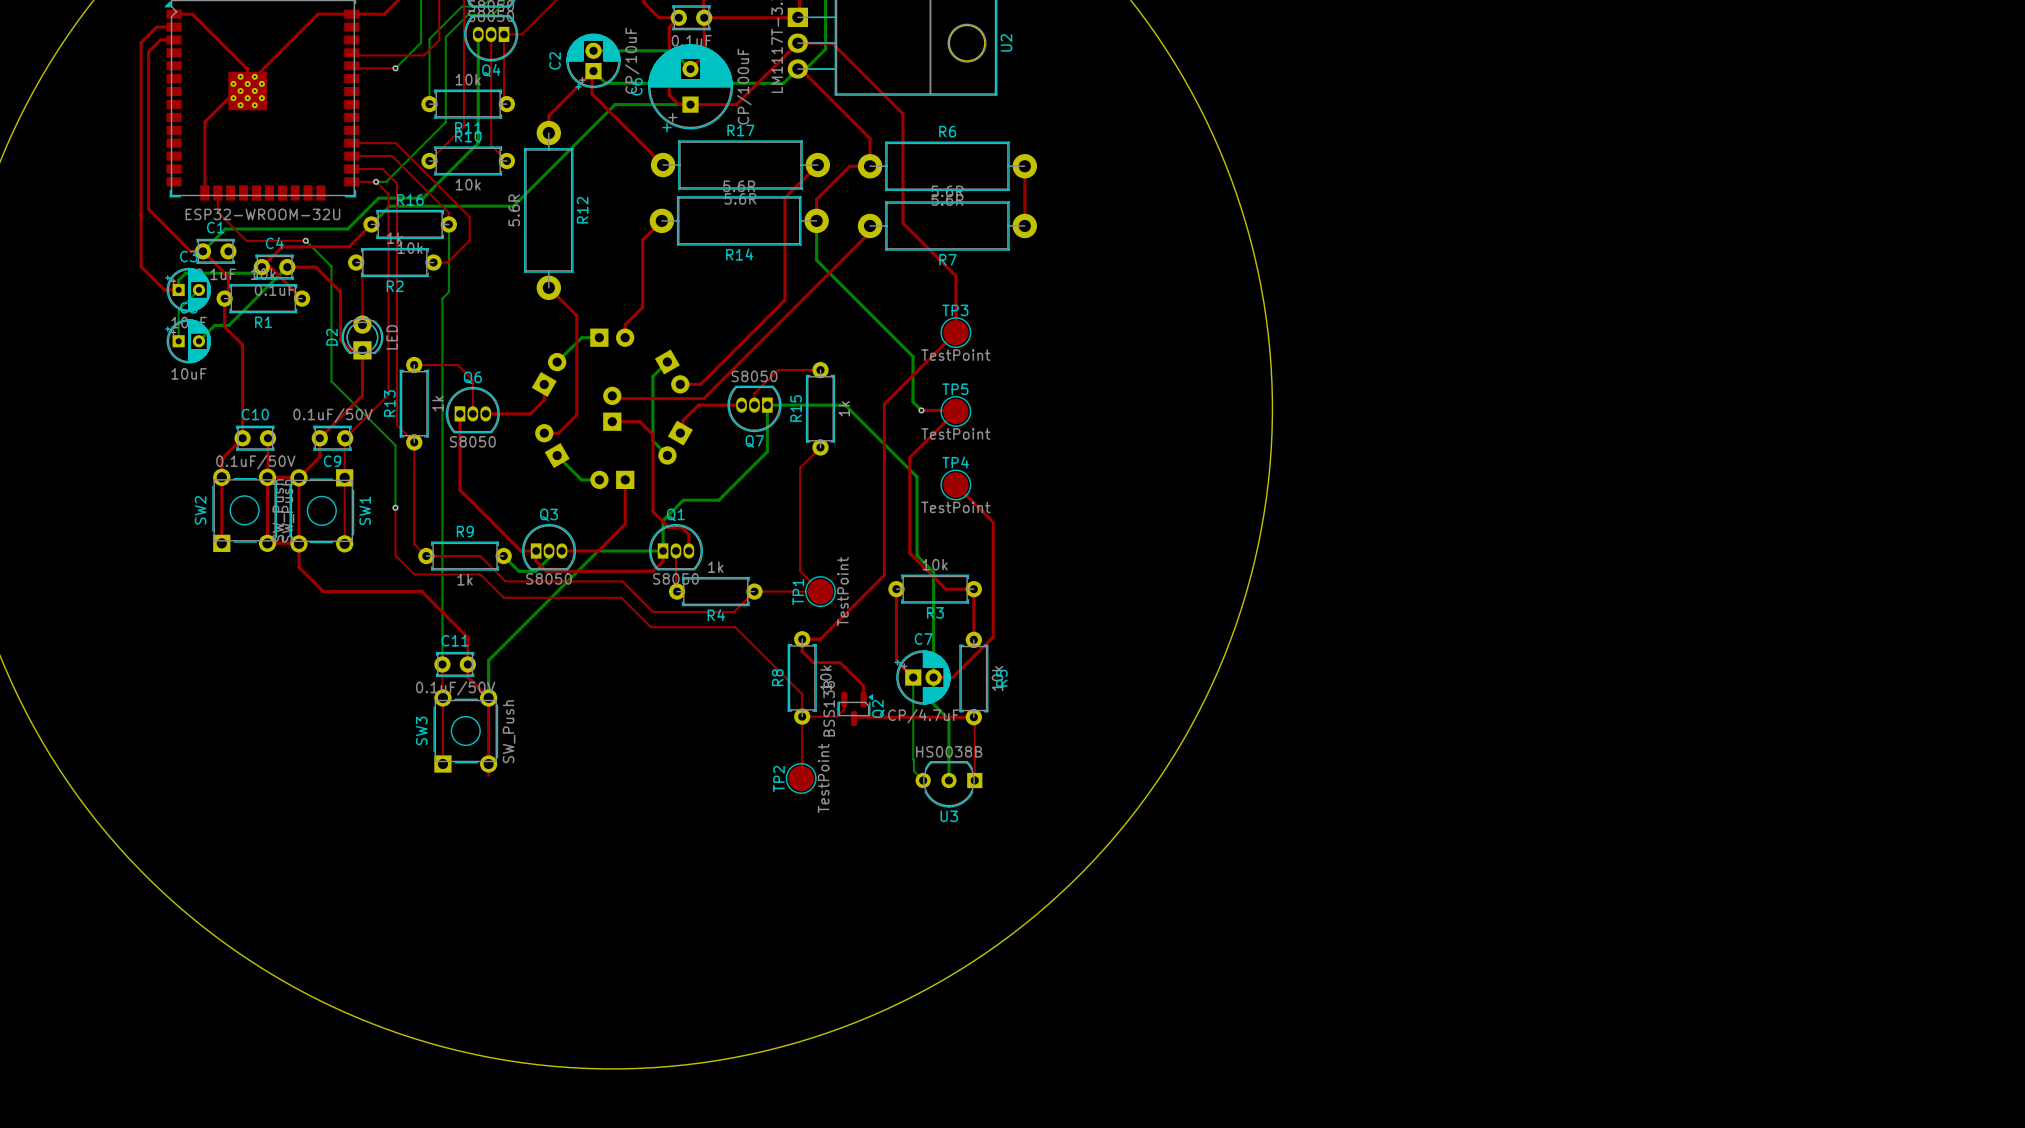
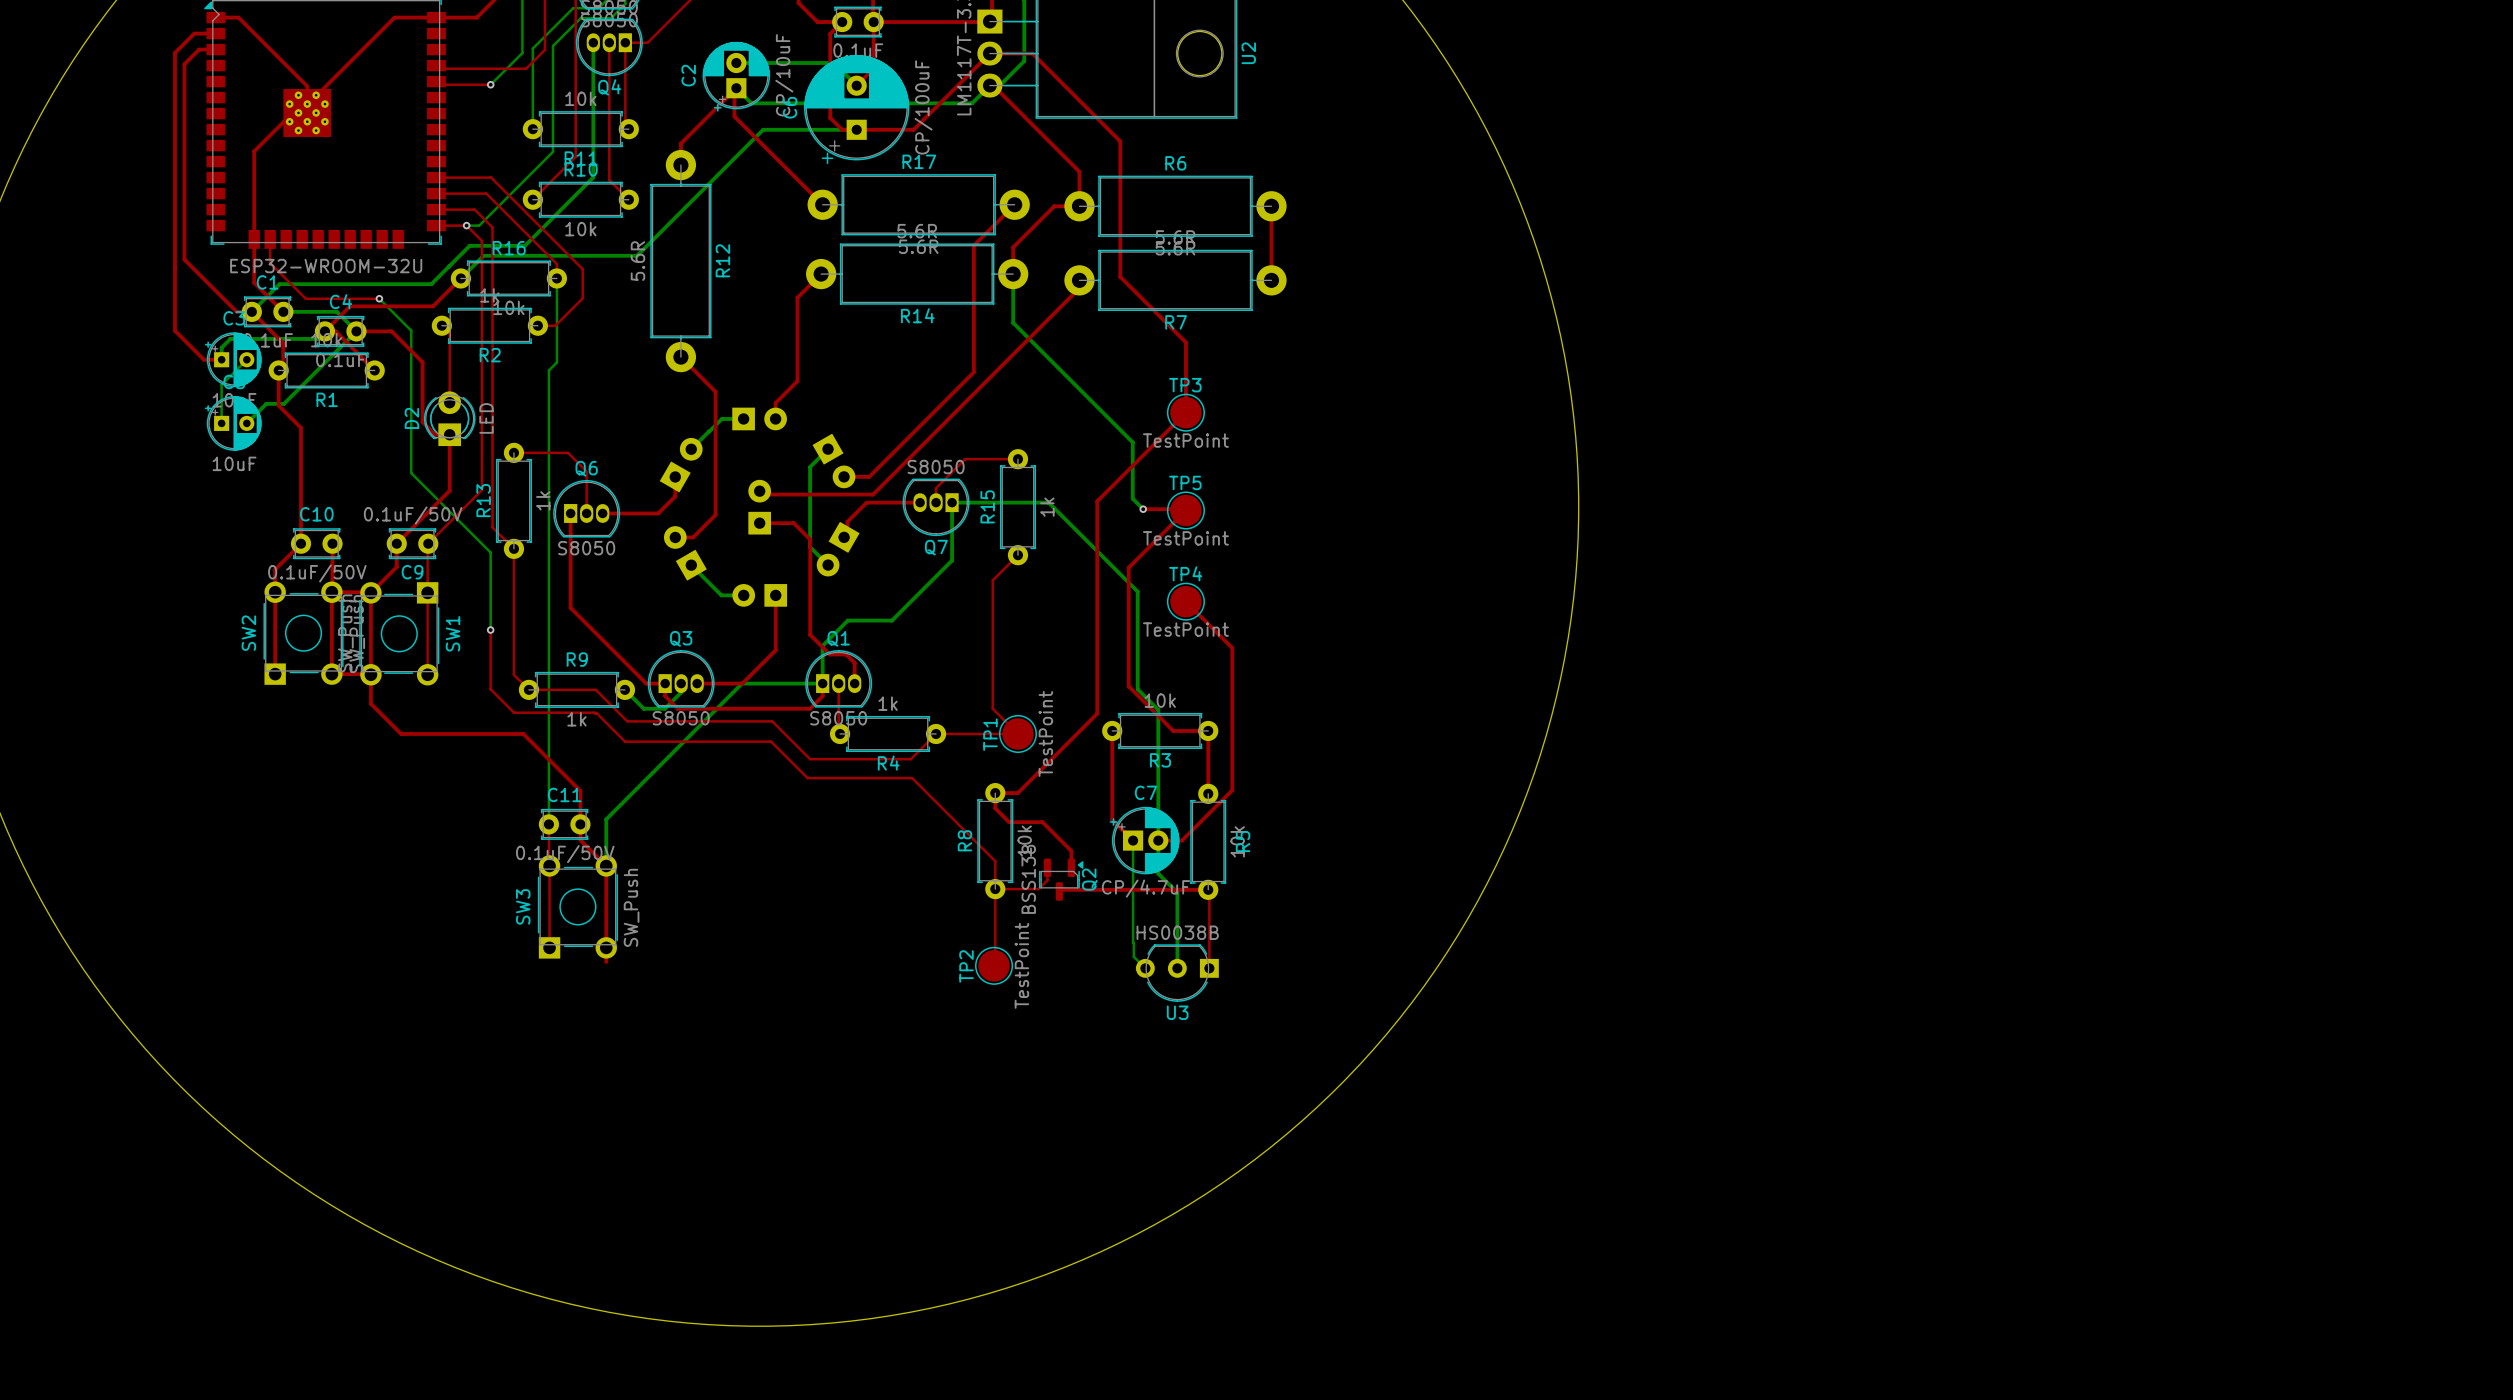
top track: none -> (254, 239) (254, 282) (283, 311)
bottom track: none -> (283, 311) (336, 311) (356, 331)

